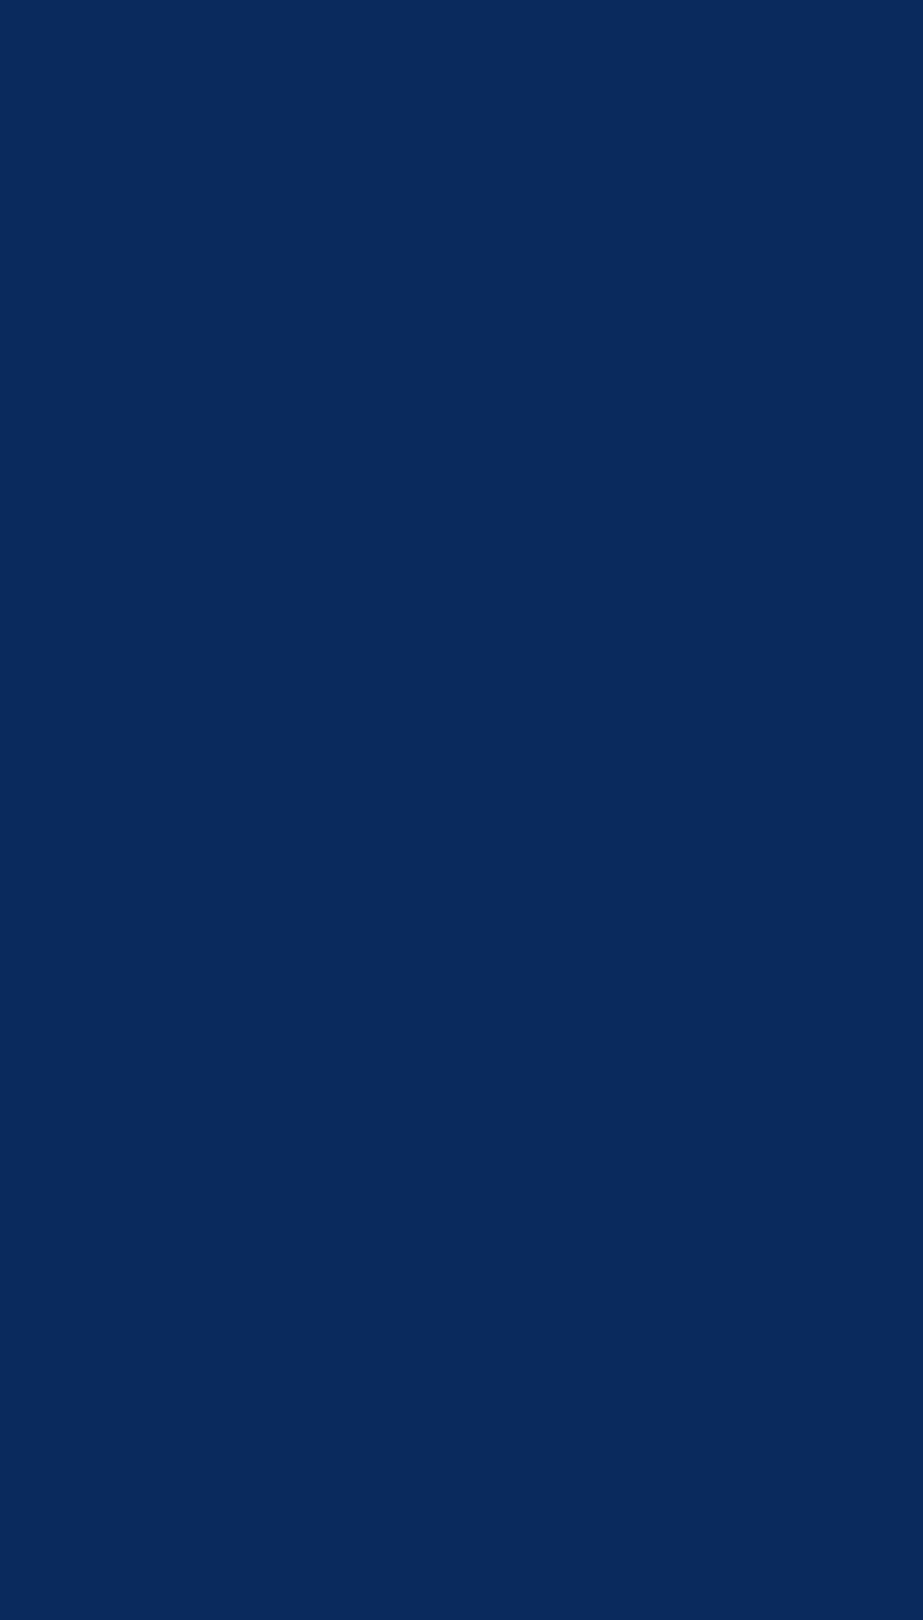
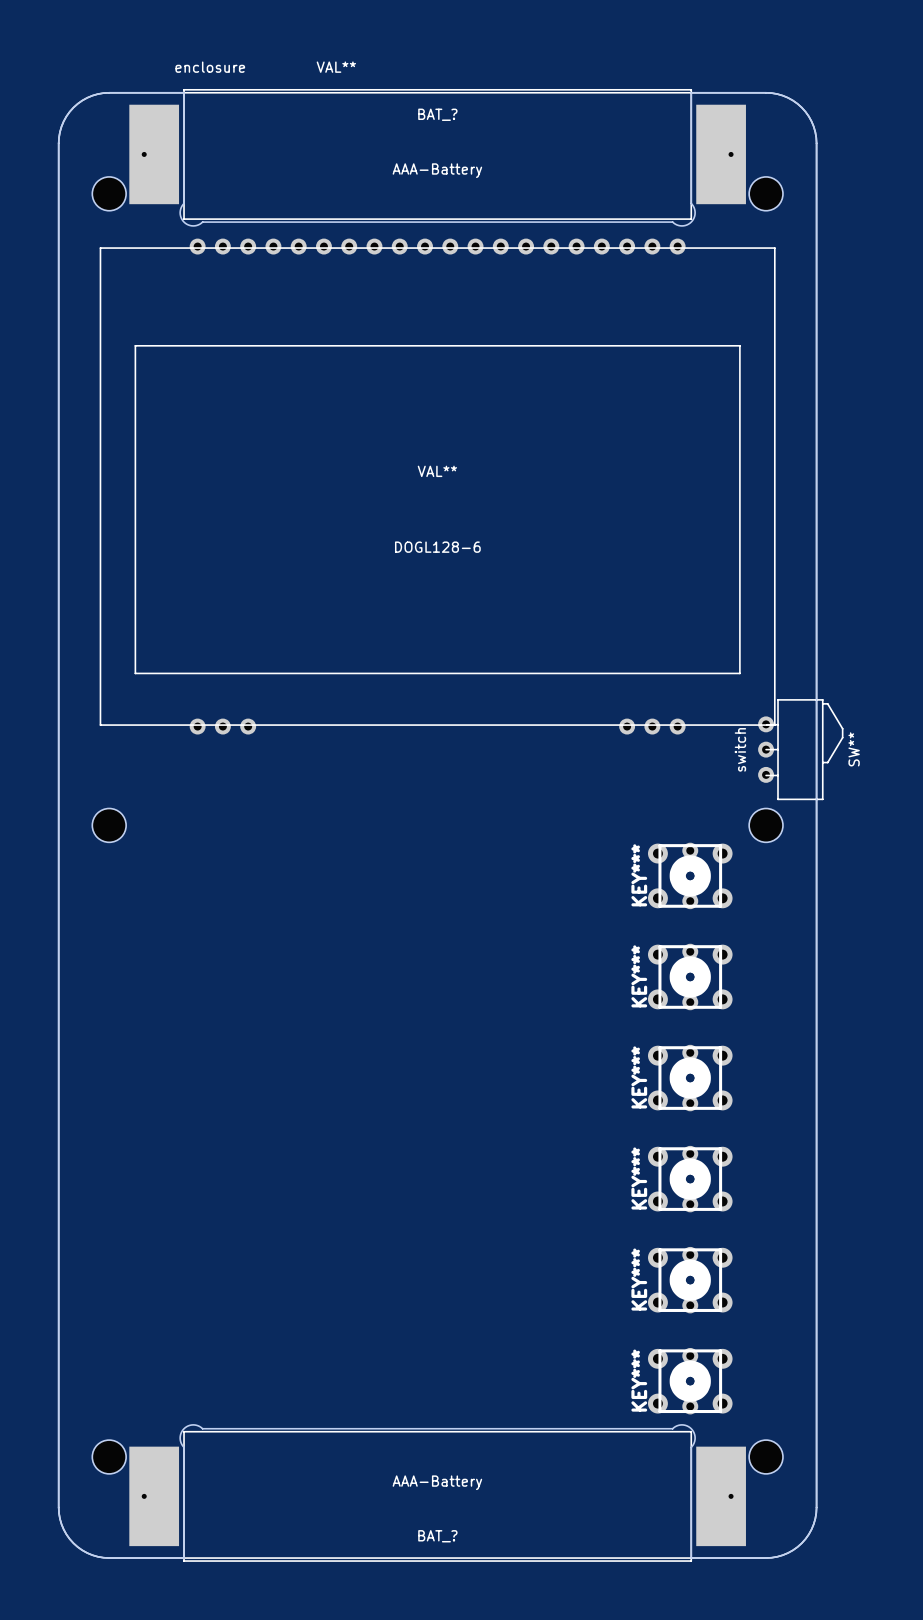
board edge: none -> (109, 92) (184, 92) (184, 203) (180, 214) (185, 223) (193, 225) (202, 222) (672, 222) (683, 225) (691, 222) (695, 212) (691, 203) (691, 92) (777, 94) (797, 103) (811, 121) (816, 143) (816, 1507) (815, 1518) (808, 1534) (801, 1543) (787, 1553) (766, 1558) (691, 1558) (691, 1447) (695, 1436) (691, 1428) (681, 1424) (672, 1428) (202, 1428) (191, 1425) (182, 1430) (180, 1438) (184, 1447) (184, 1558) (97, 1556) (77, 1547) (63, 1529) (58, 1507) (58, 143) (63, 121) (73, 107) (87, 97) (109, 92)
BAT_?: none -> AAA-Battery (437, 154)
DOGL128-6: none -> VAL** (437, 486)
switch: none -> SW** (800, 749)
enclosure: none -> VAL** (437, 825)
KEY***: none -> (690, 875)
KEY***: none -> (690, 976)
KEY***: none -> (690, 1078)
KEY***: none -> (690, 1179)
KEY***: none -> (690, 1280)
KEY***: none -> (690, 1381)
BAT_?: none -> AAA-Battery (437, 1496)

